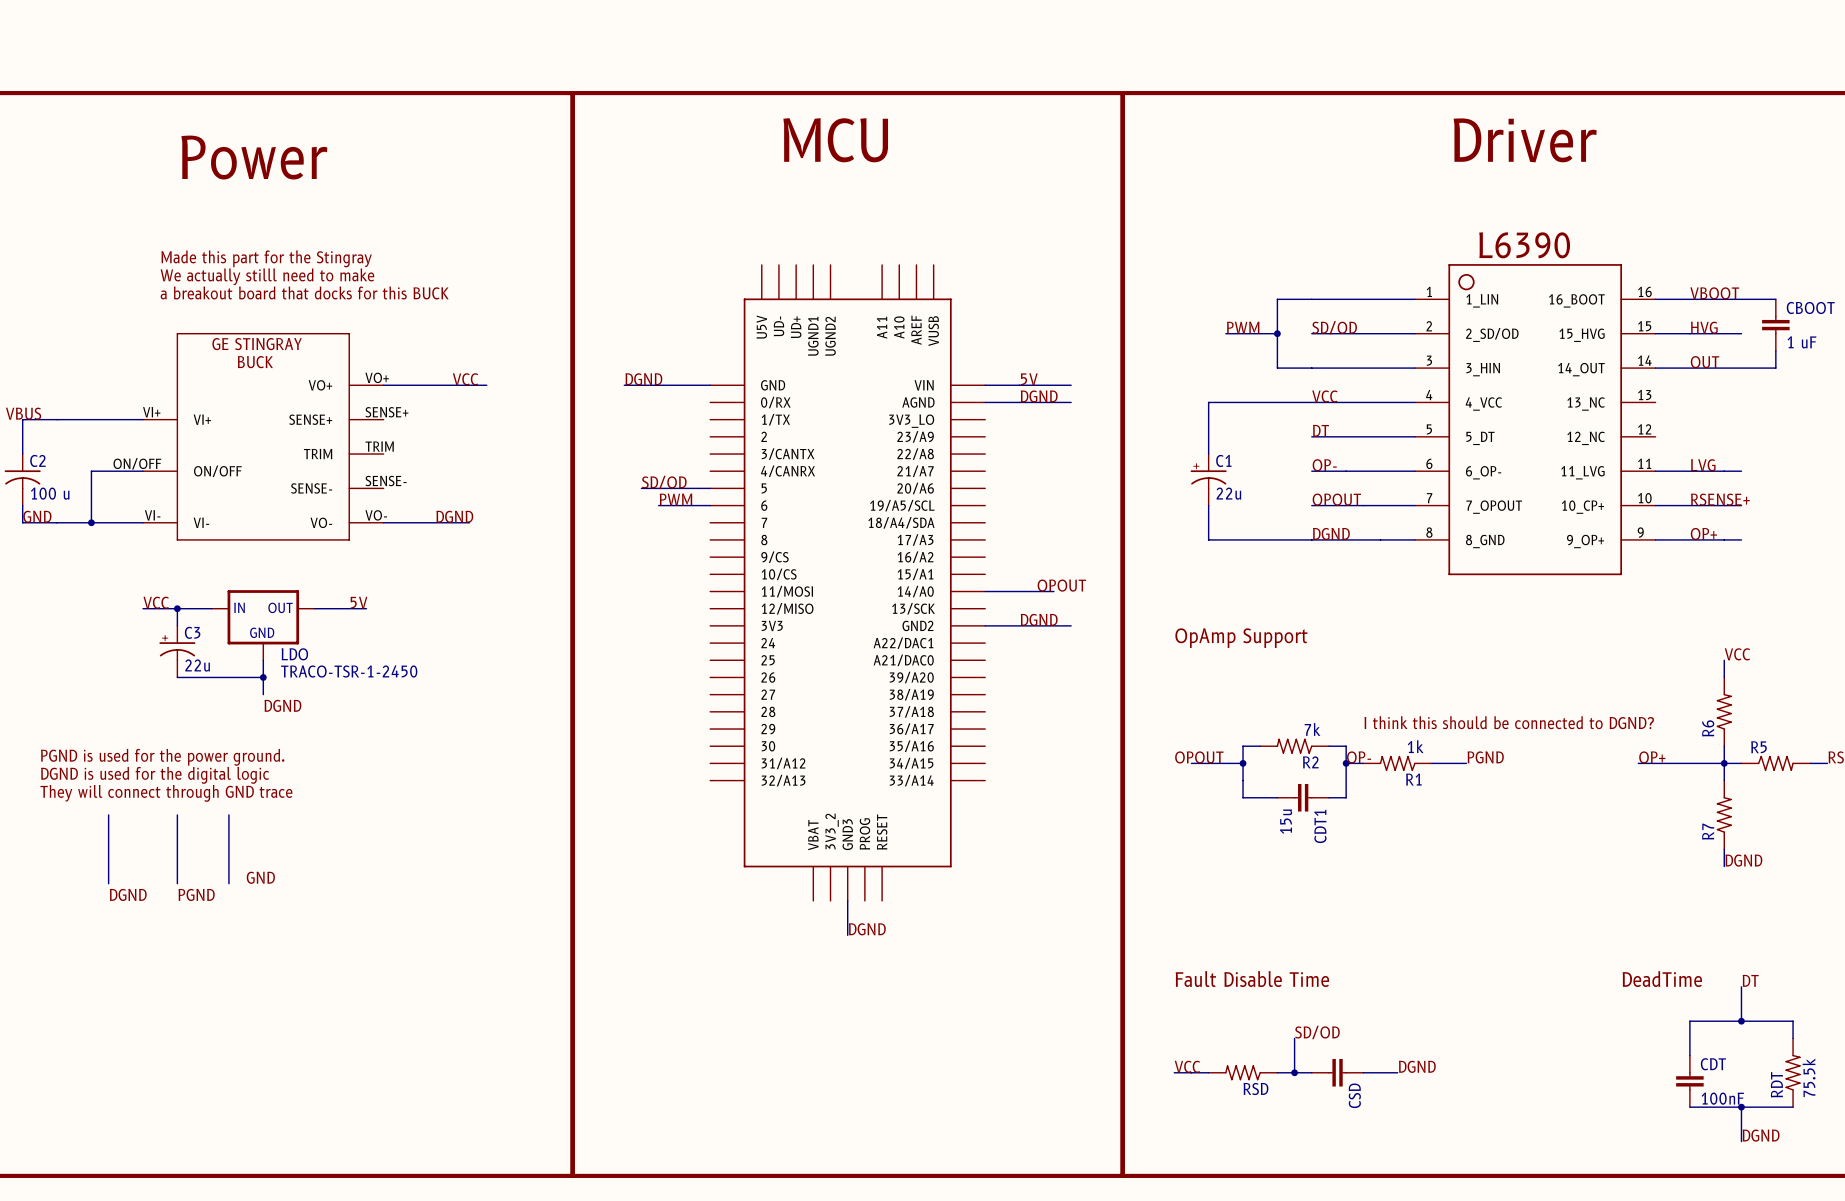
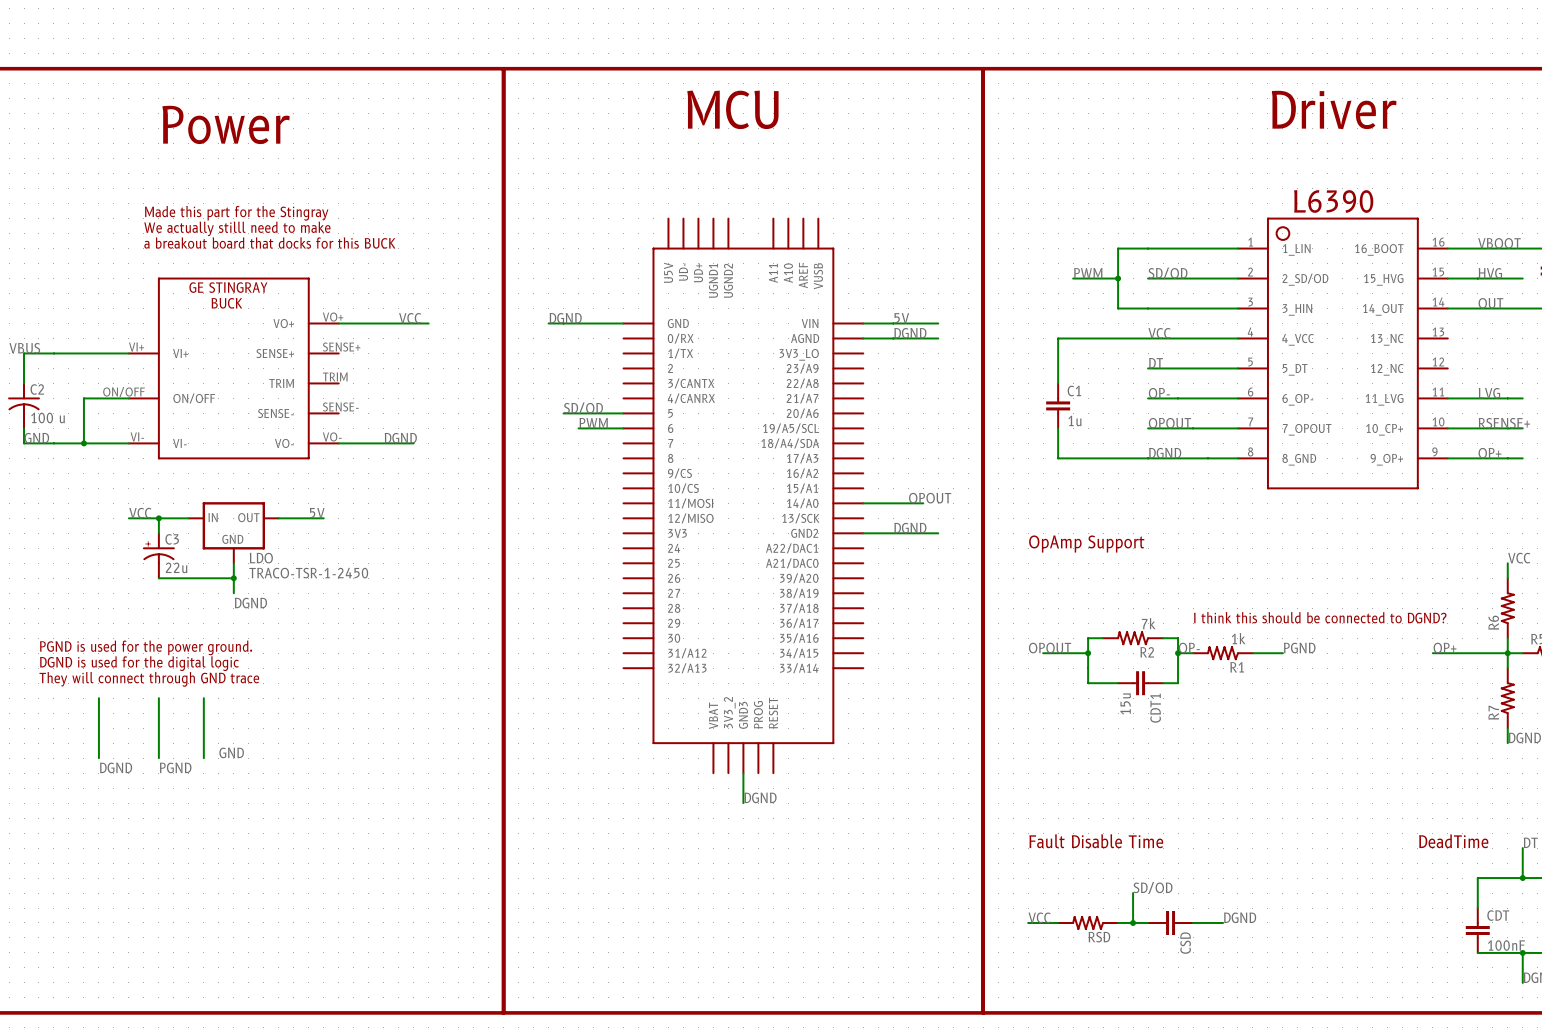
C1 symbol: [1190, 454, 1227, 506] -> [1046, 383, 1071, 429]
C1 value: 22u (1228, 493) -> 1u (1074, 420)

